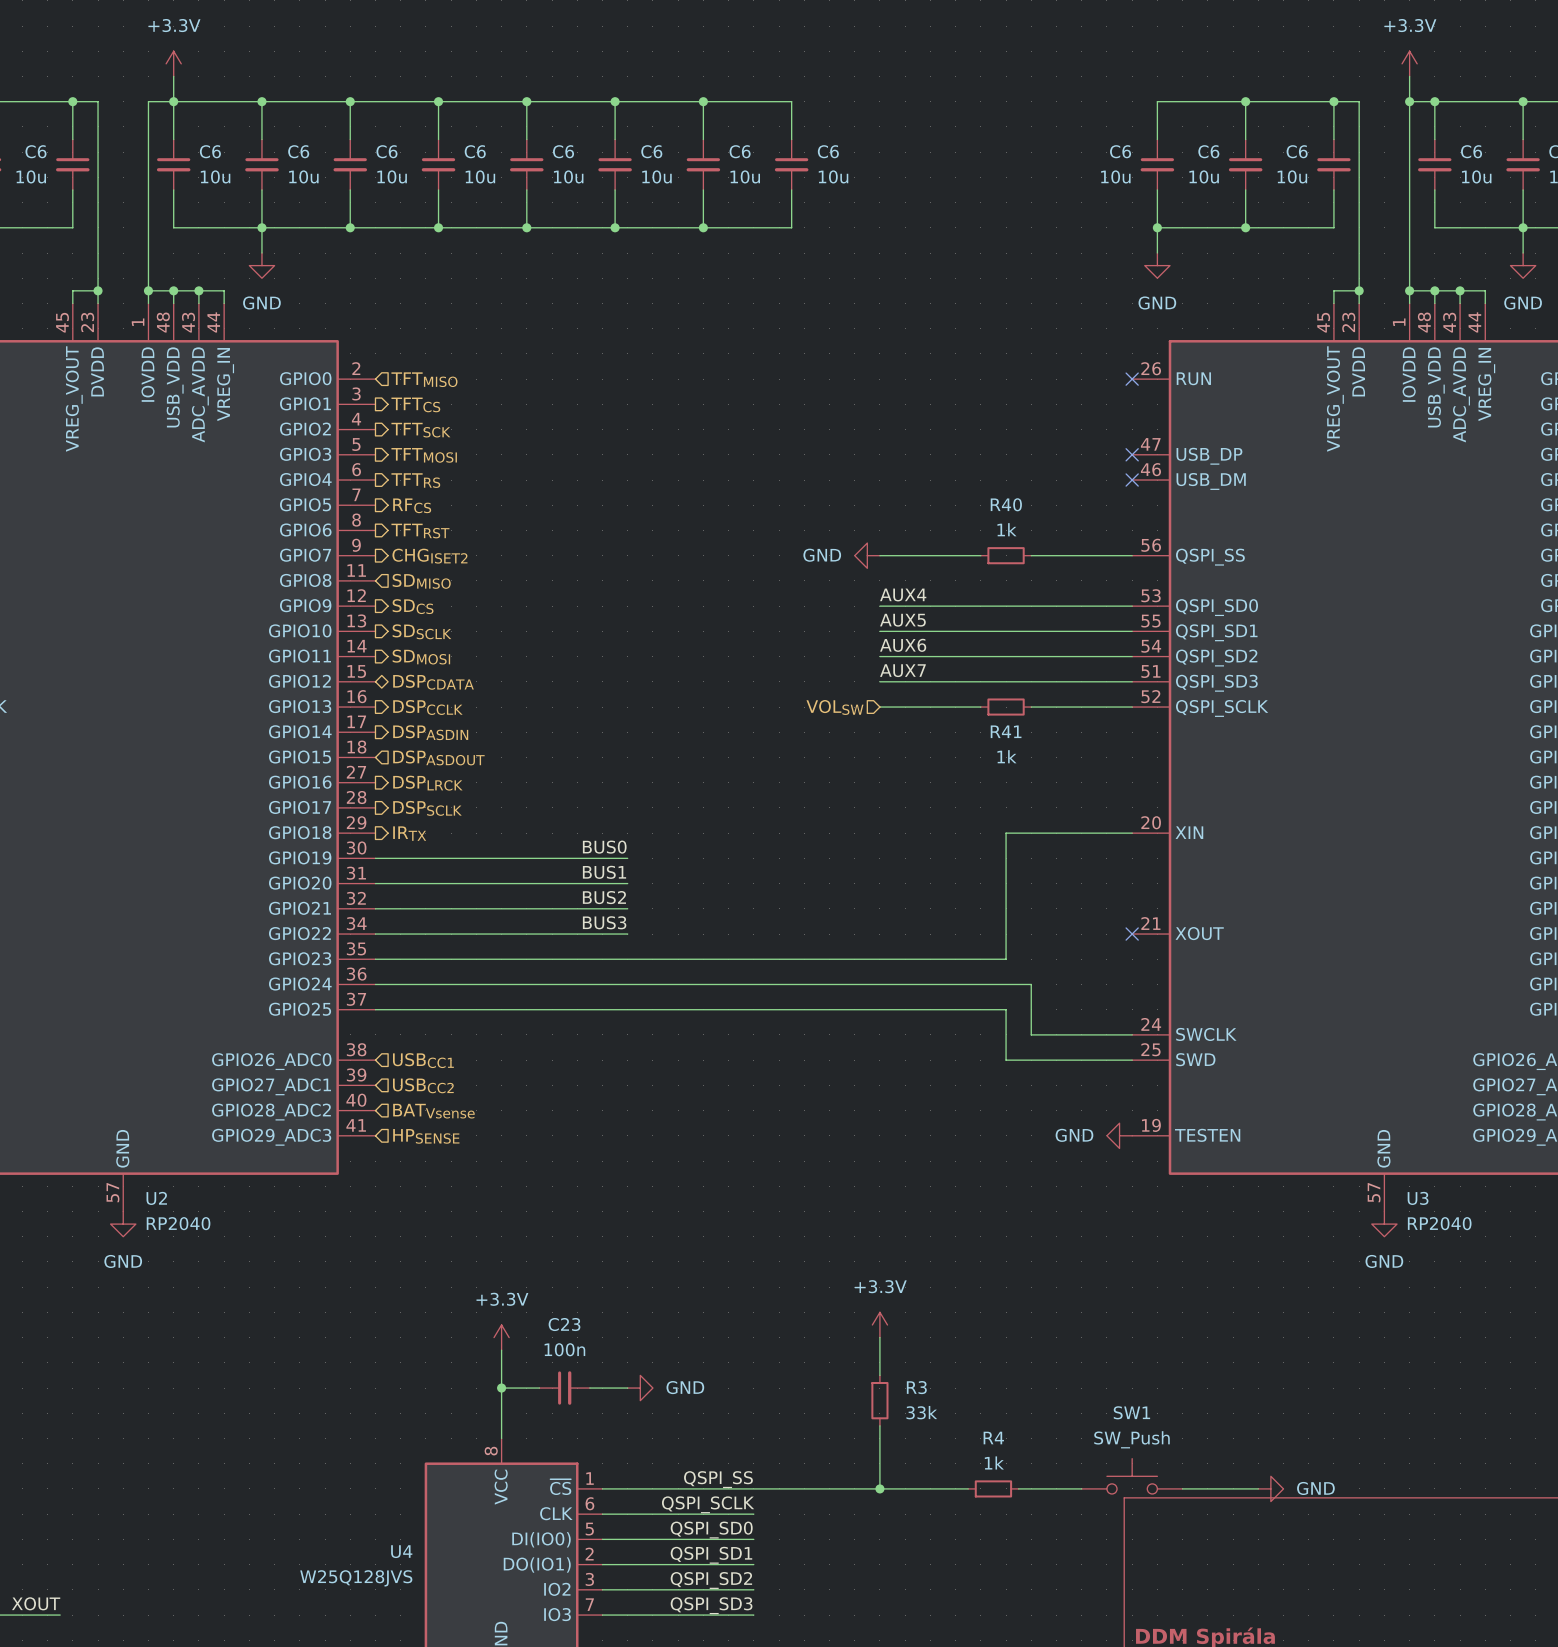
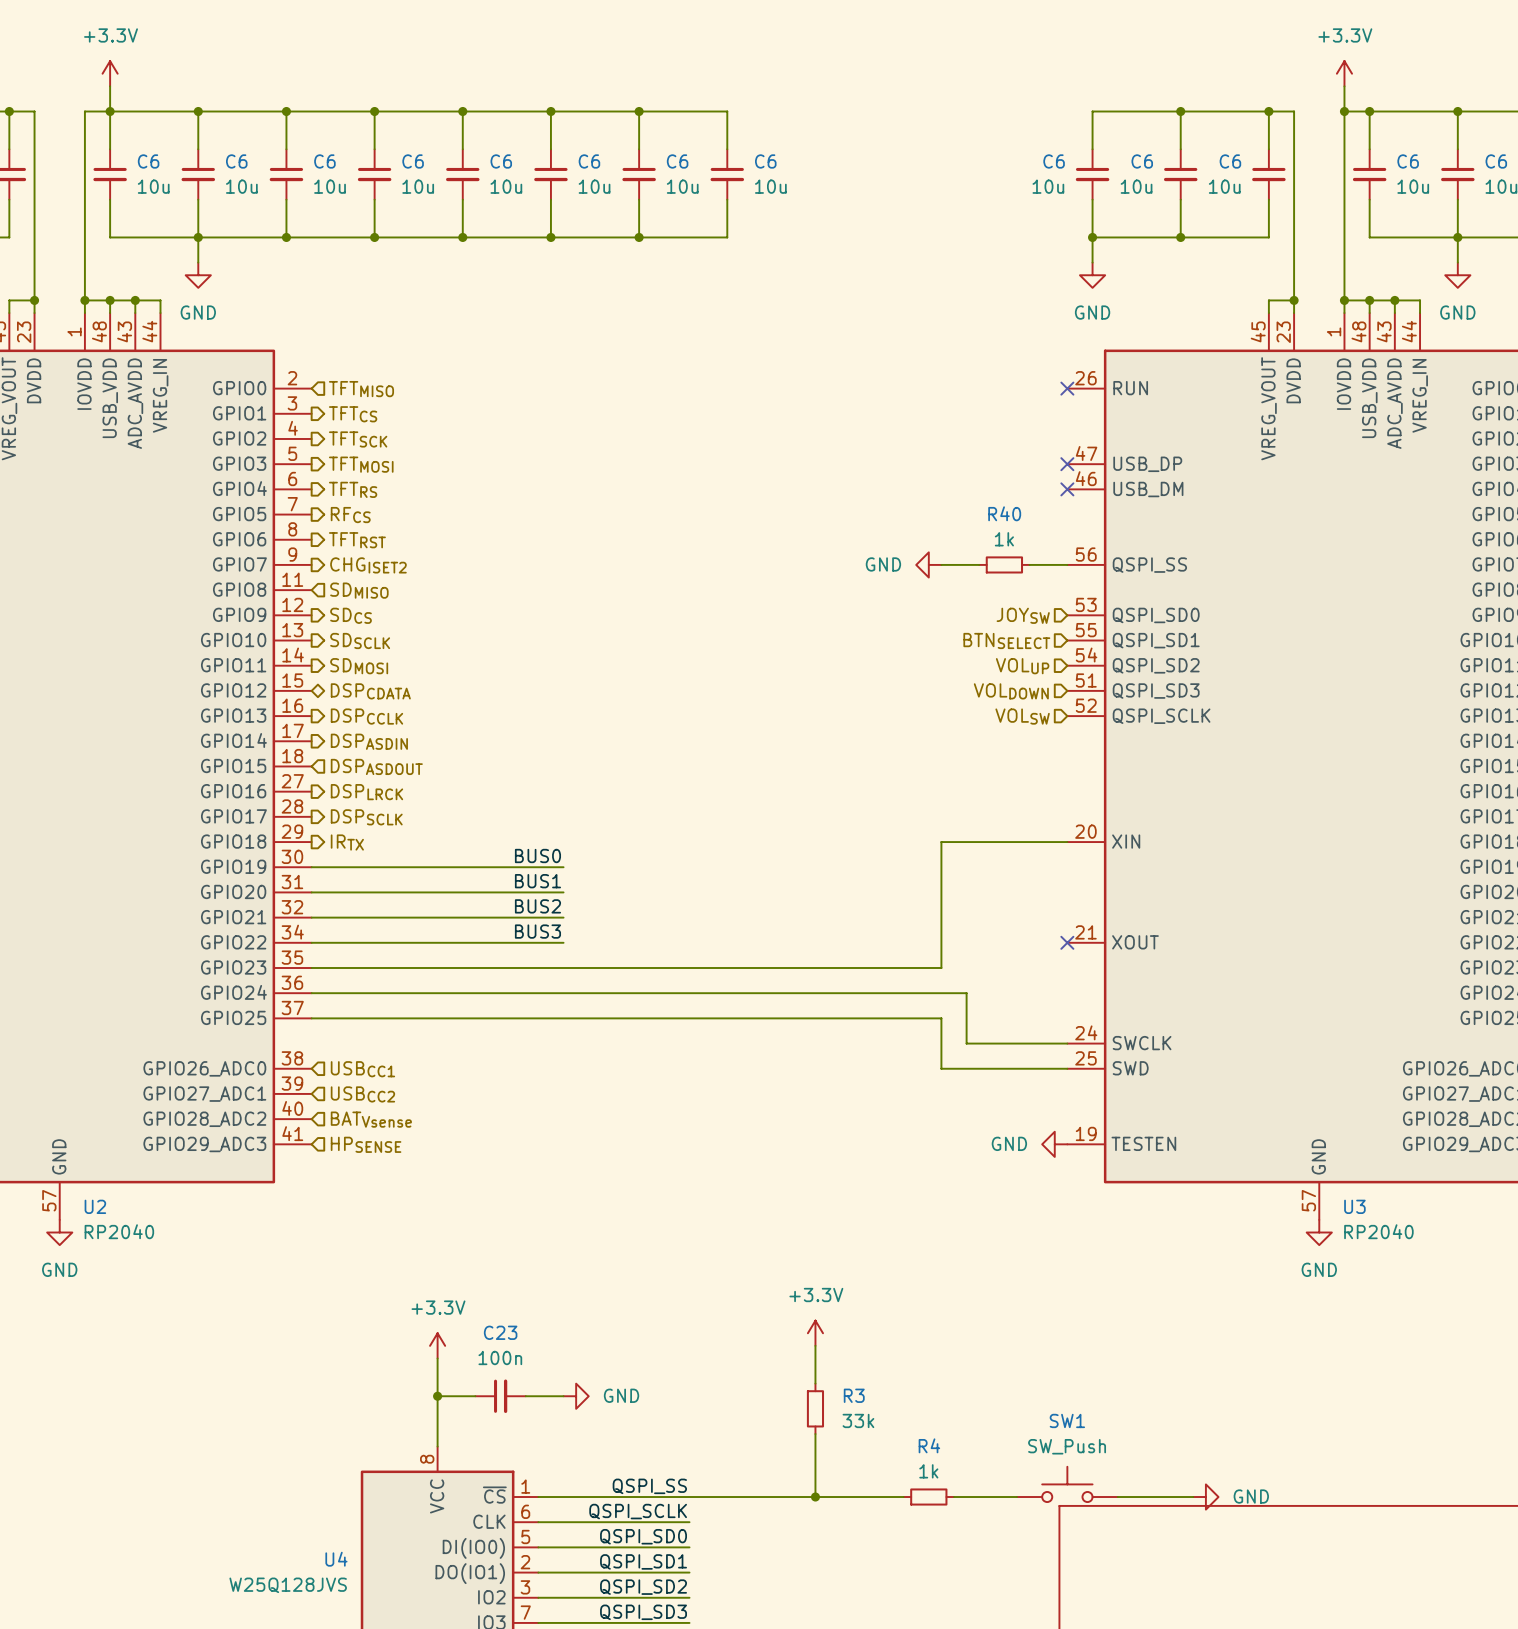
power symbol position: GND (867, 555) -> GND (928, 564)
wire: (879, 555) (980, 555) -> none
wire: none -> (941, 564) (966, 564)
R40 position: (1006, 555) -> (1004, 564)
wire: (1043, 555) (1094, 555) -> none
label: AUX4 (903, 595) -> none
wire: (879, 606) (1132, 606) -> none
hierarchical label: none -> JOYSW (1023, 615)
label: AUX5 (902, 620) -> none
wire: (879, 631) (1132, 631) -> none
hierarchical label: none -> BTNSELECT (1006, 640)
label: AUX6 (903, 645) -> none
wire: (879, 656) (1132, 656) -> none
hierarchical label: none -> VOLUP (1022, 666)
label: AUX7 (902, 670) -> none
wire: (879, 681) (1132, 681) -> none
hierarchical label: none -> VOLDOWN (1011, 691)
hierarchical label: VOLSW (834, 707) -> none
wire: (879, 707) (980, 707) -> none
R41: 1k (1006, 707) -> none
wire: (1031, 707) (1132, 707) -> none
hierarchical label: none -> VOLSW (1022, 716)

